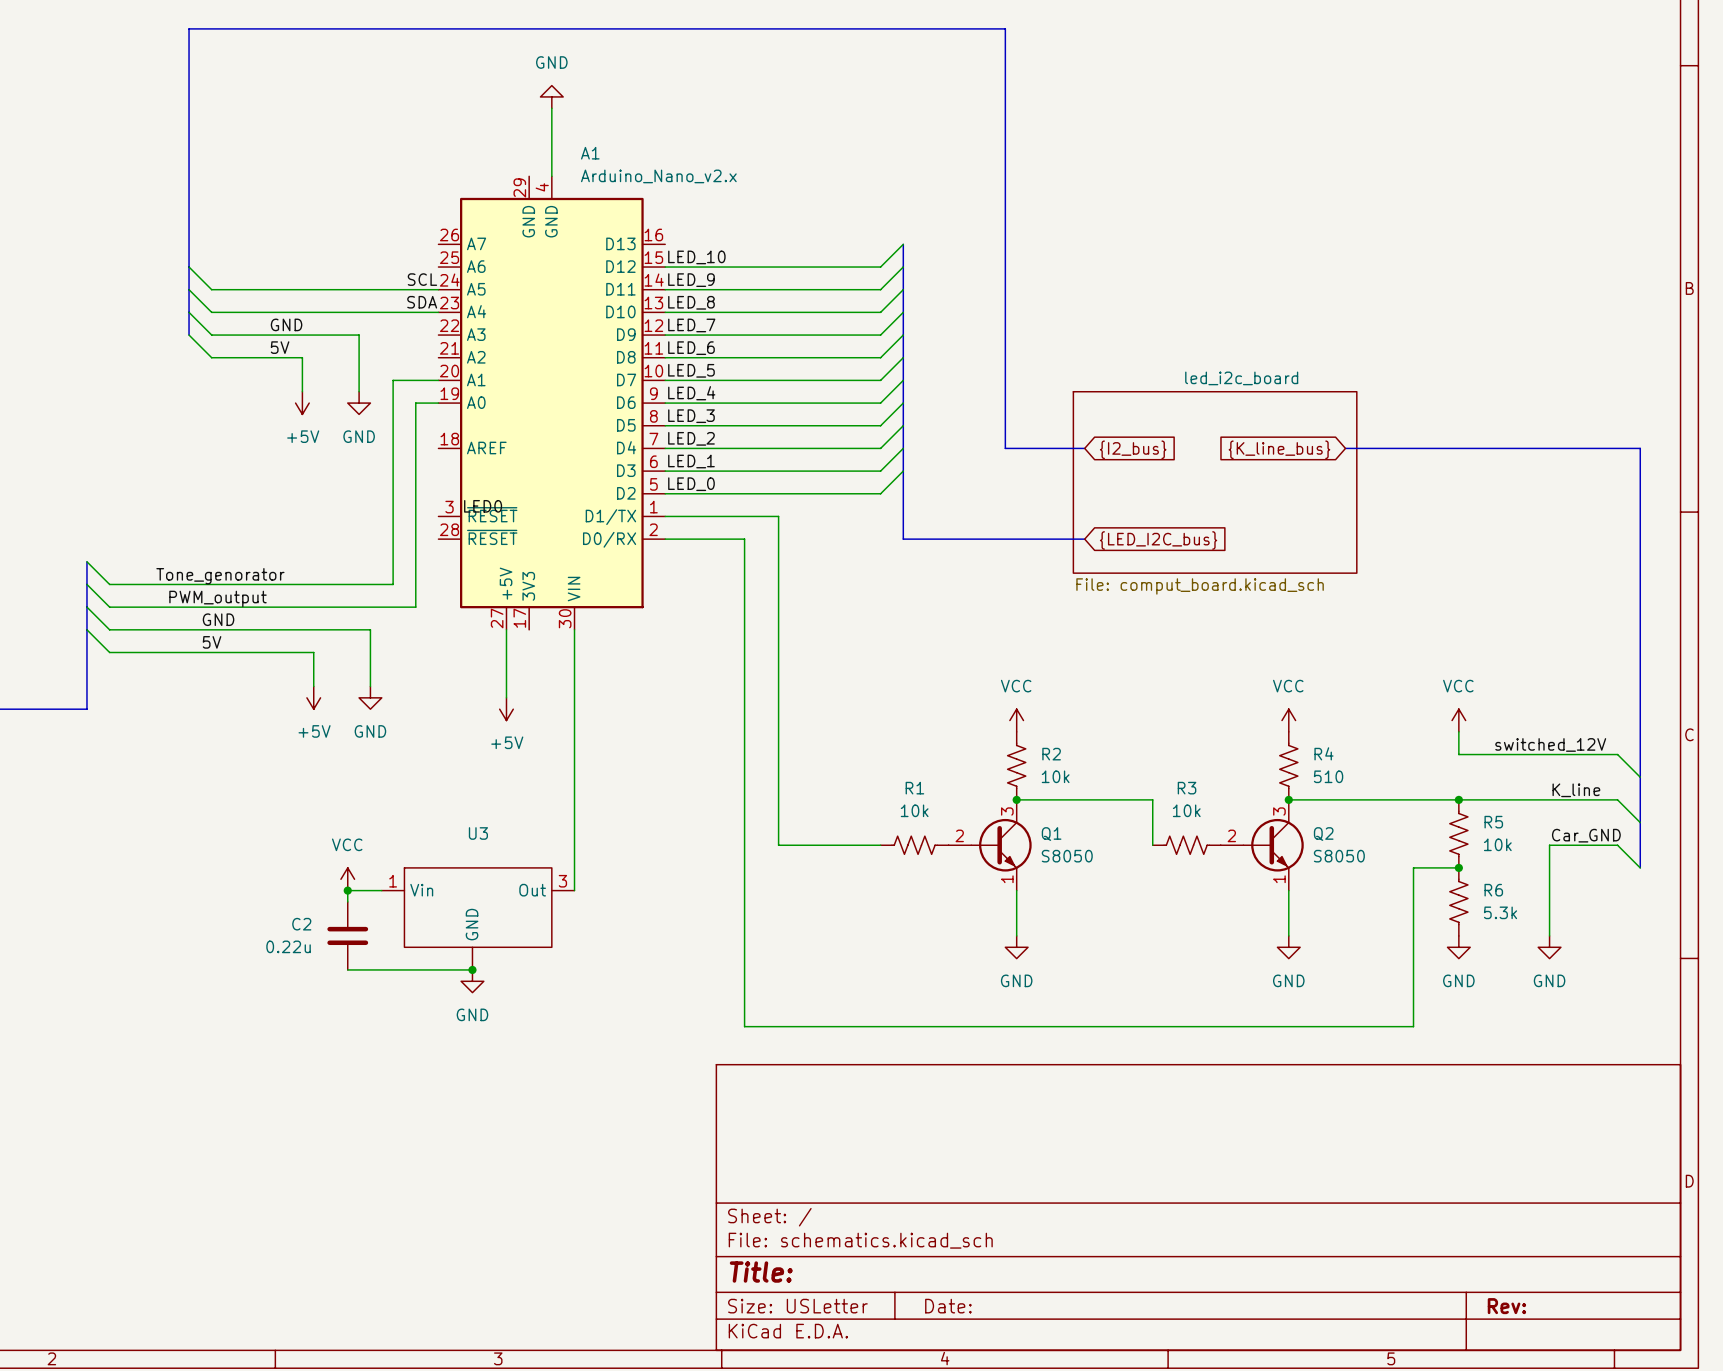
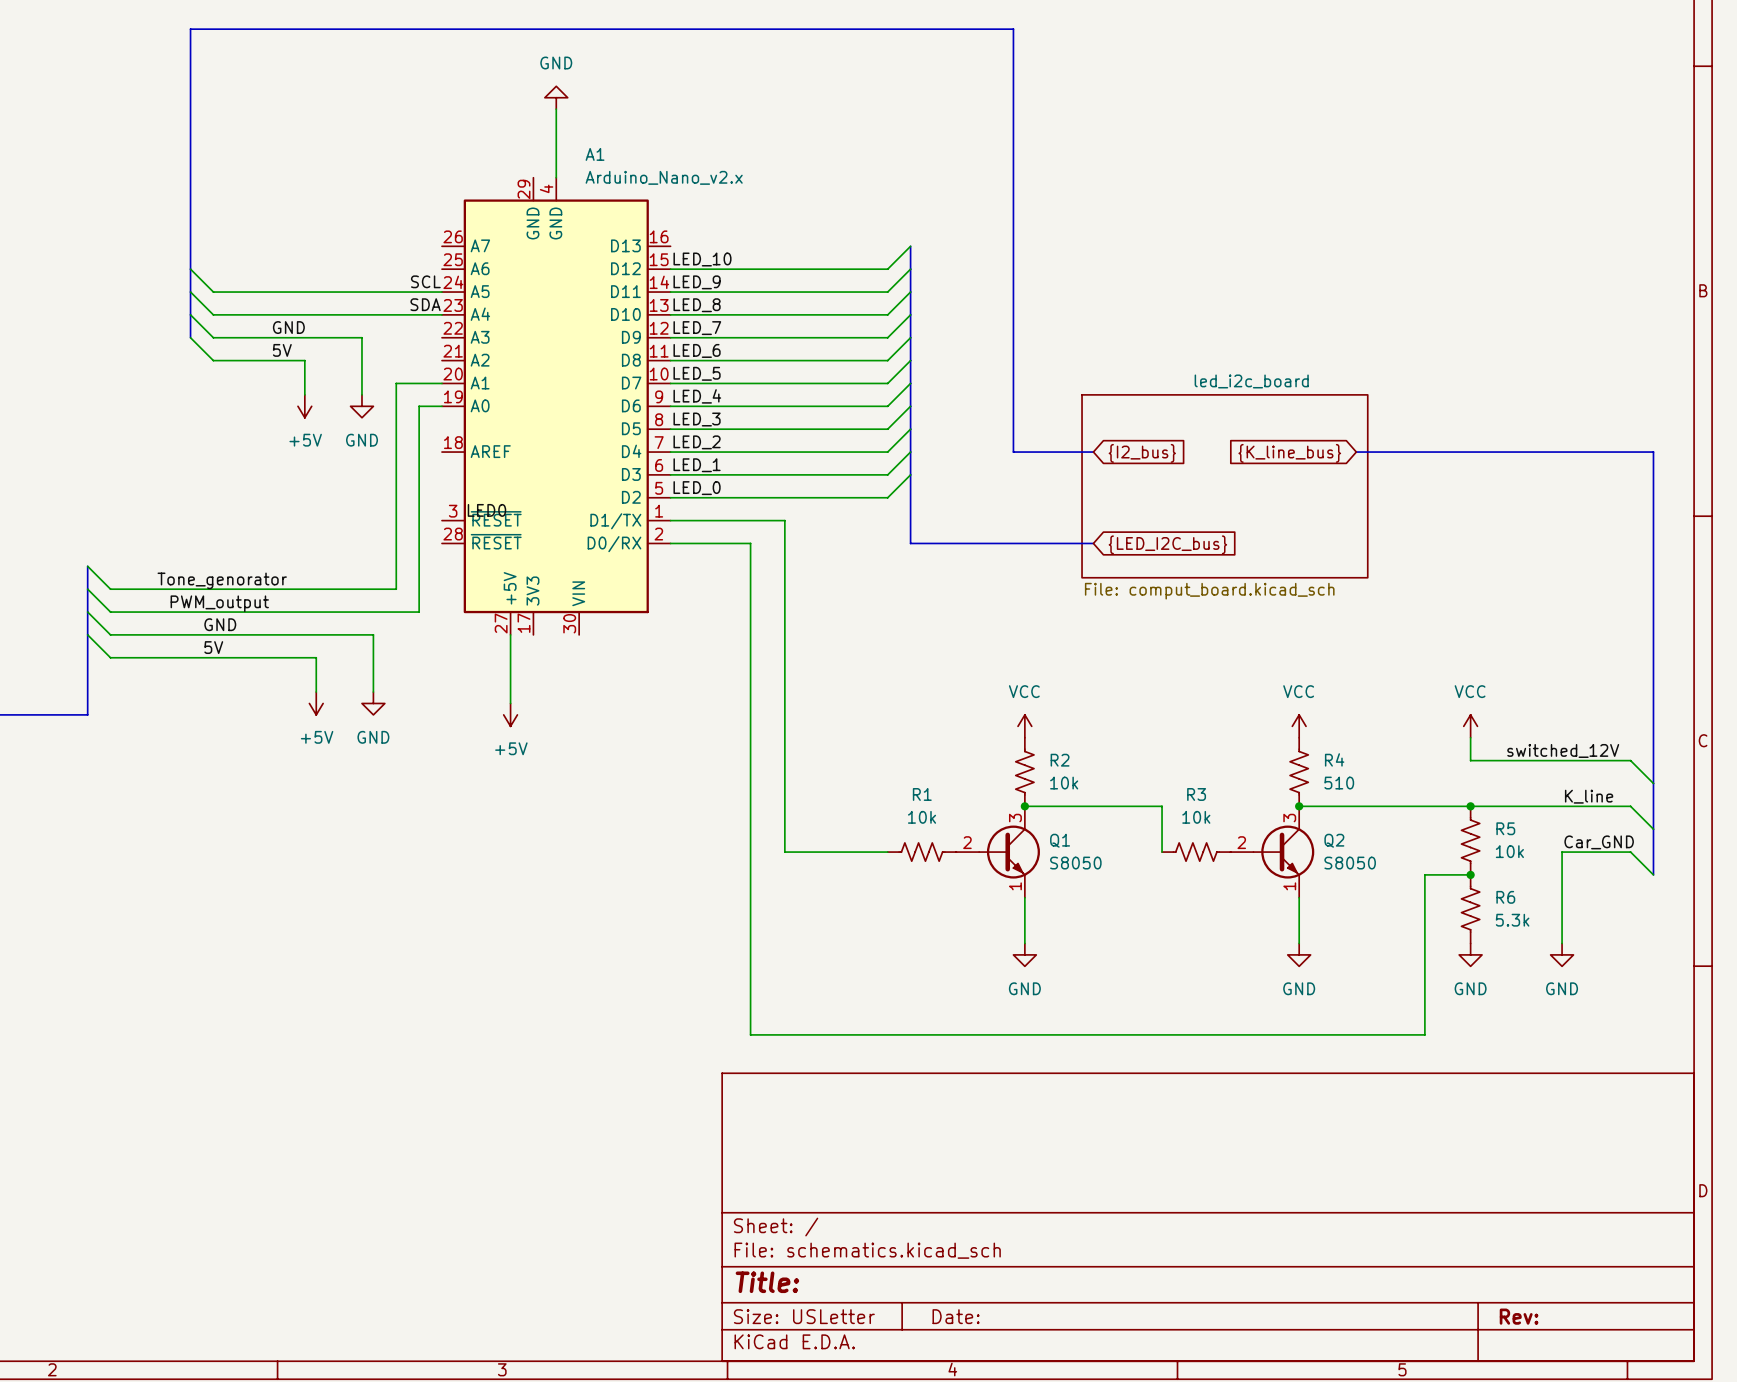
wire: (574, 629) (574, 890) -> none
power symbol: VCC (347, 879) -> none
junction: (347, 890) -> none
wire: (381, 890) (347, 890) (347, 901) -> none
U3: (478, 918) -> none
C2: 0.22u (347, 935) -> none
wire: (347, 969) (472, 969) -> none
junction: (472, 969) -> none
power symbol: GND (472, 981) -> none

